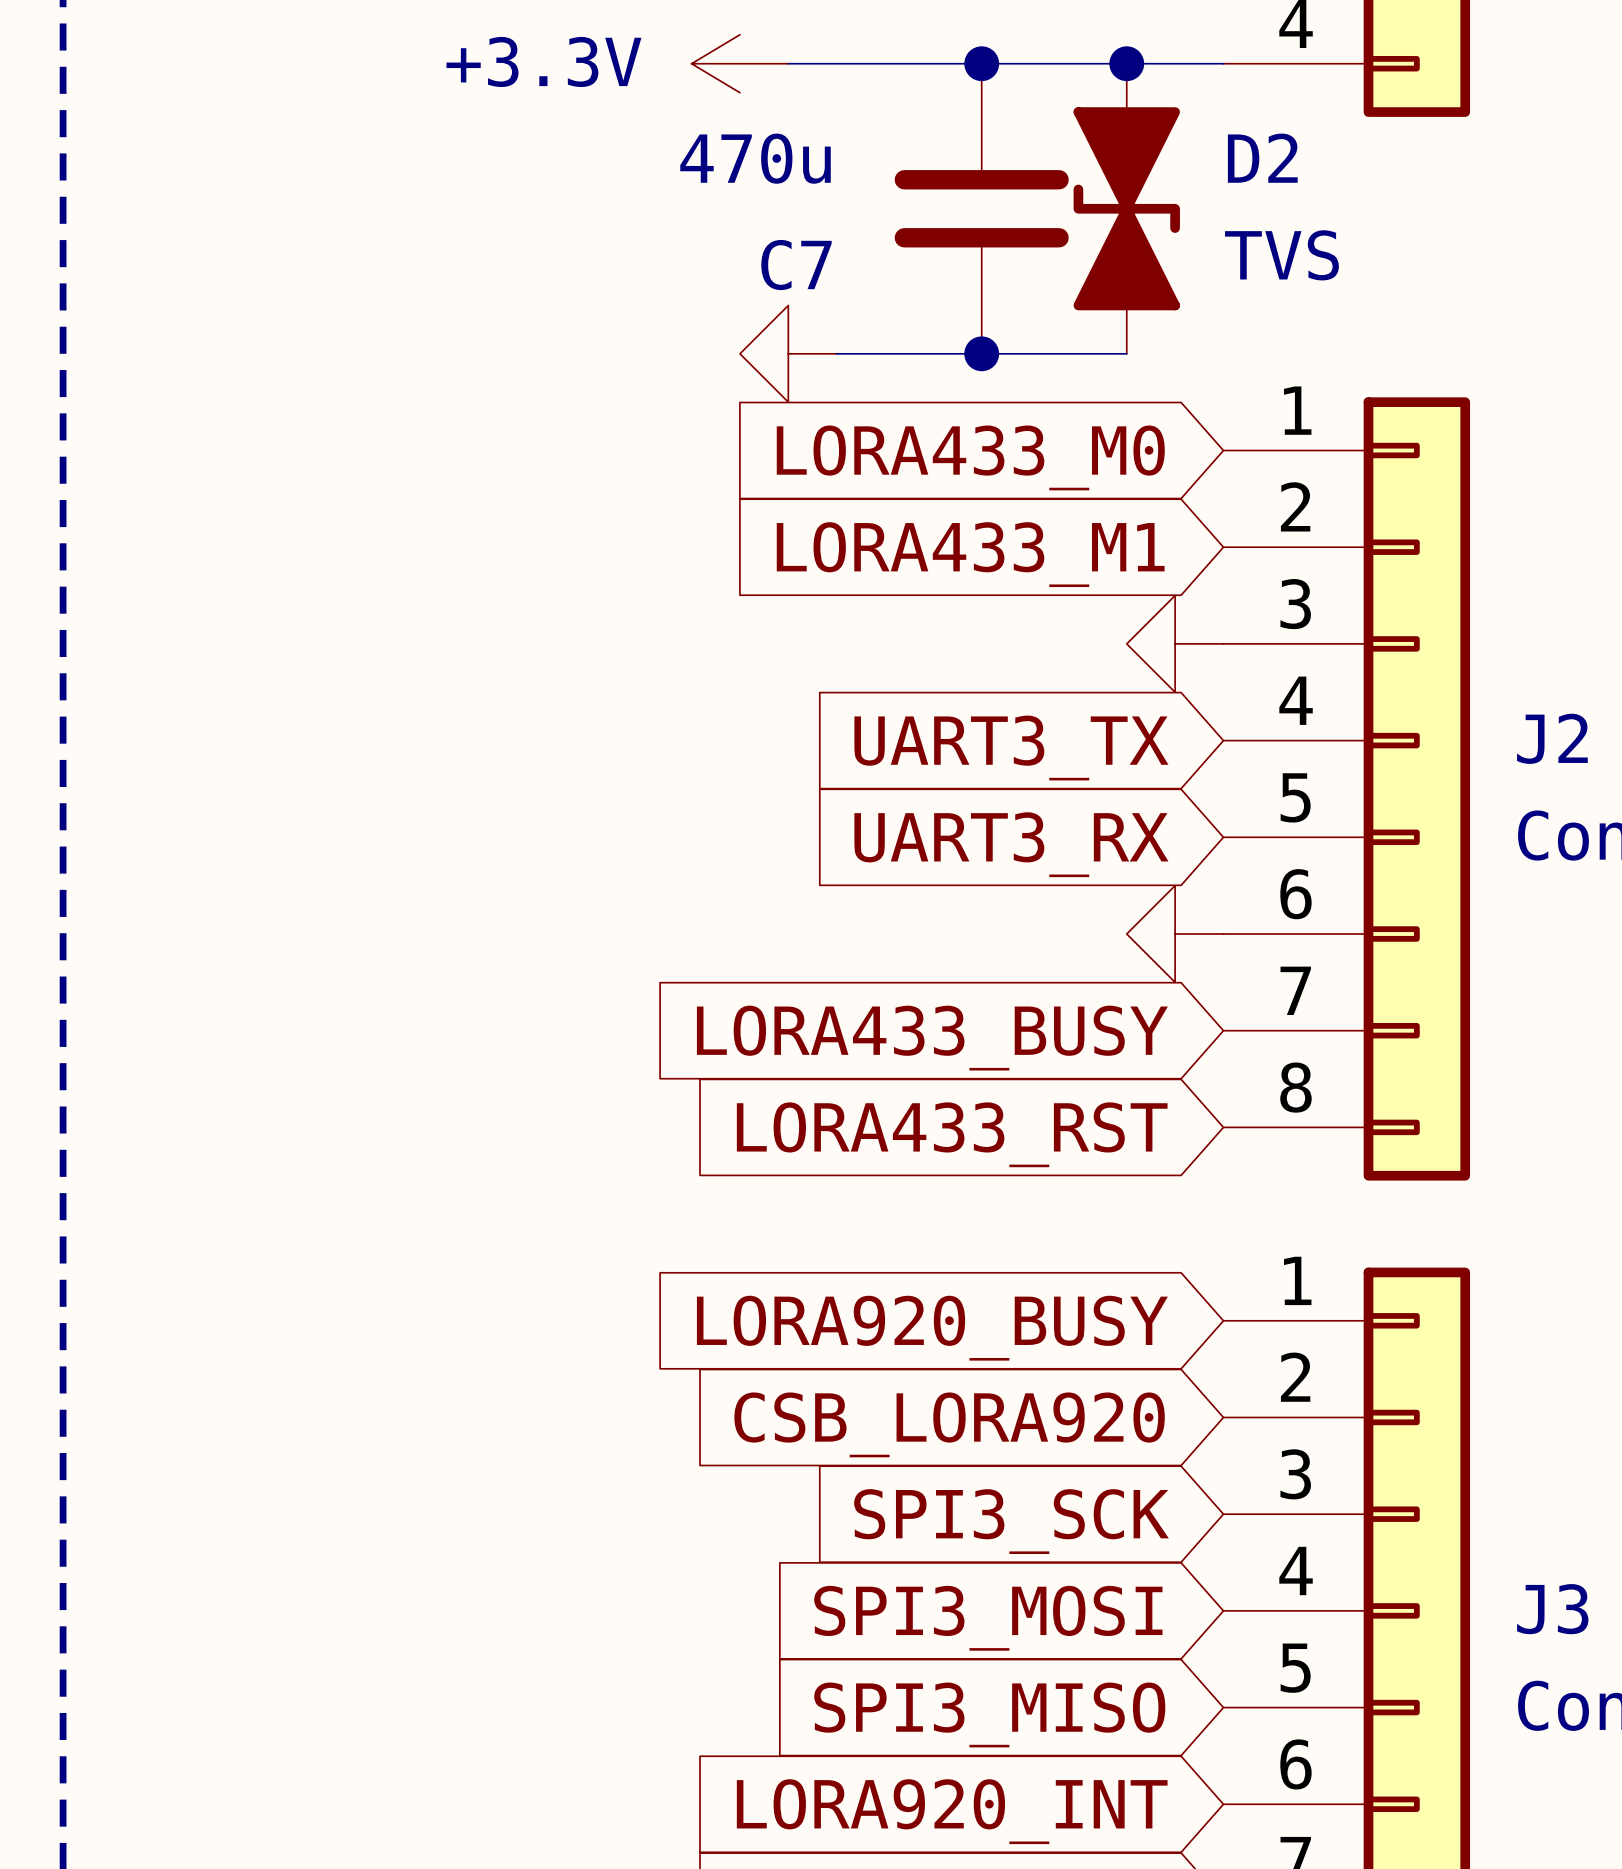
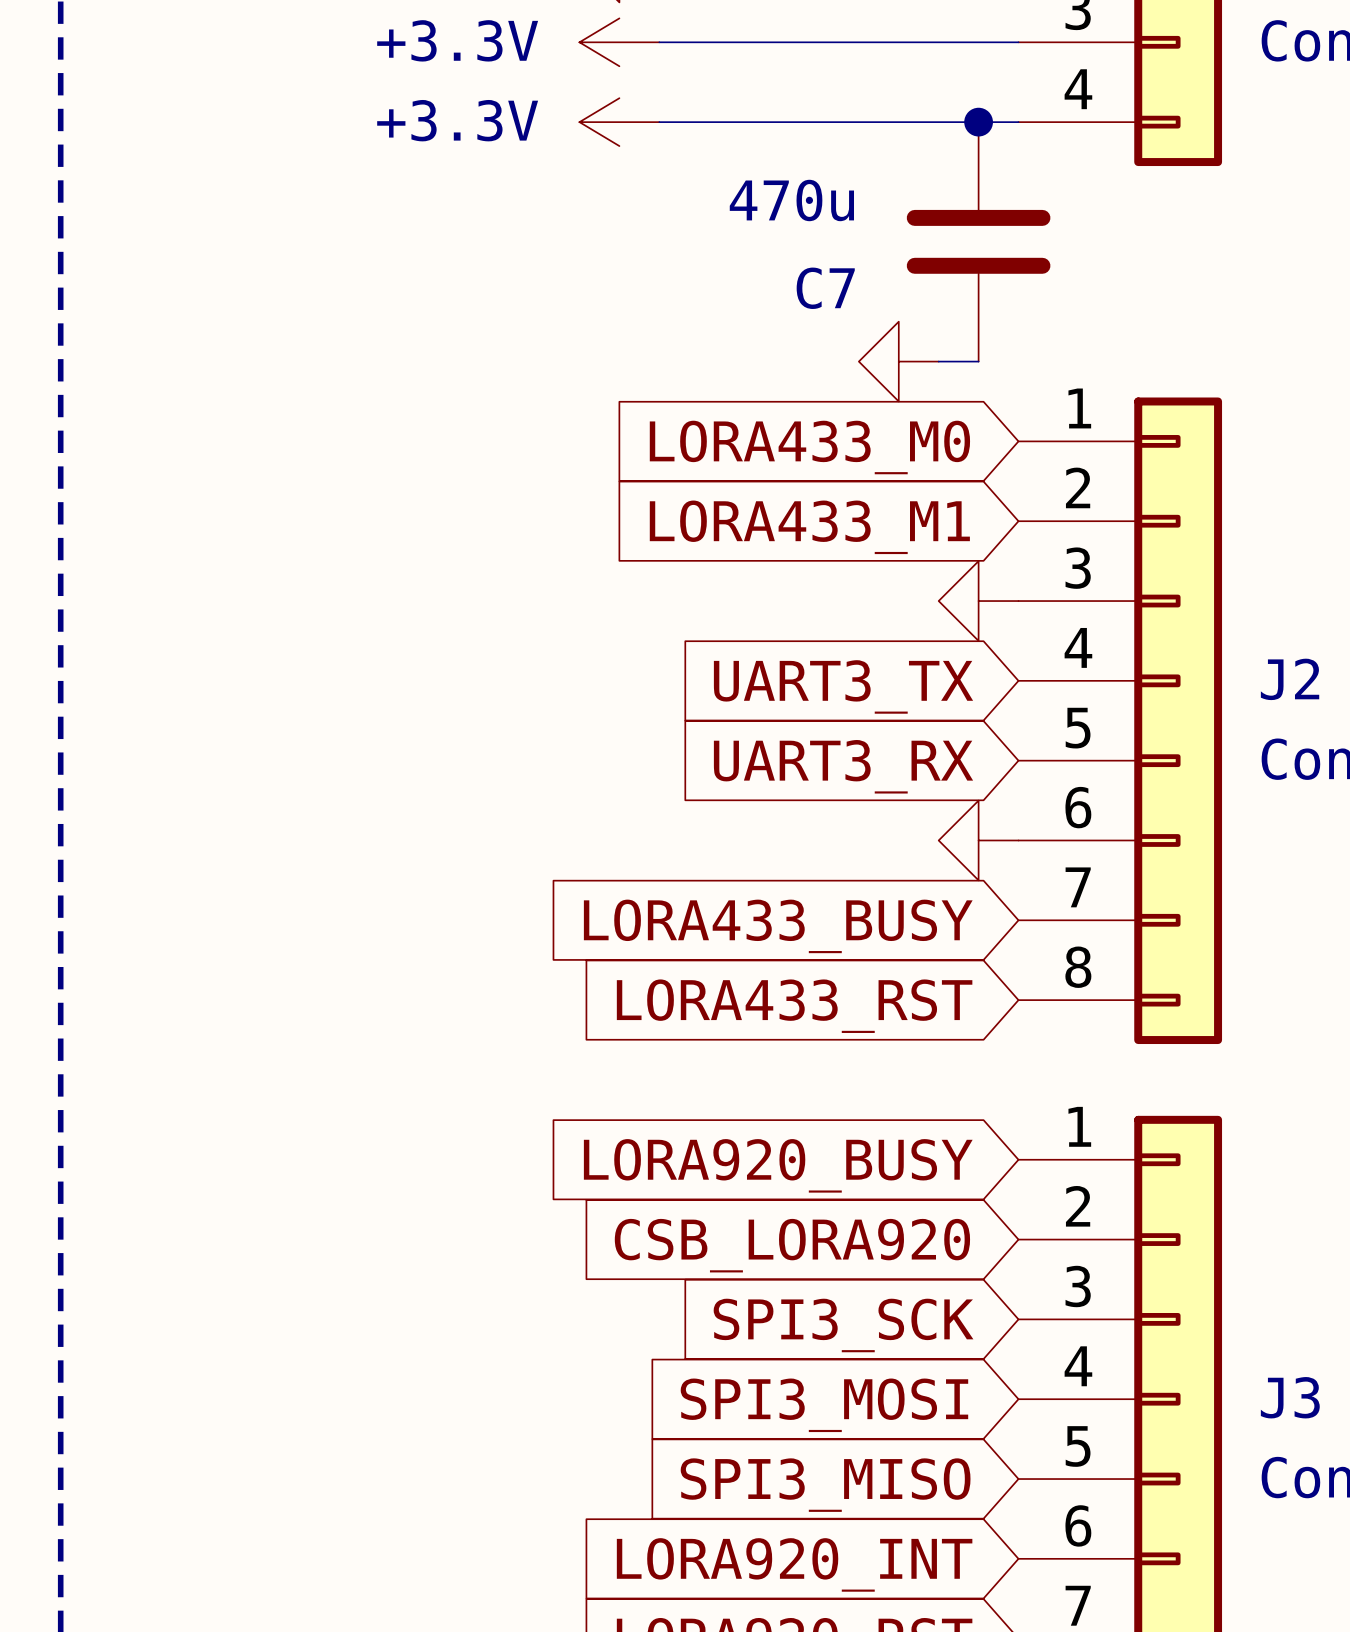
junction: (981, 63) -> none
junction position: (1126, 63) -> (978, 122)
C7 position: (981, 208) -> (978, 241)
D2: TVS (1126, 208) -> none
power symbol position: (788, 353) -> (898, 361)
wire: (836, 353) (1126, 353) -> (978, 361) (938, 361)
junction: (981, 353) -> none

